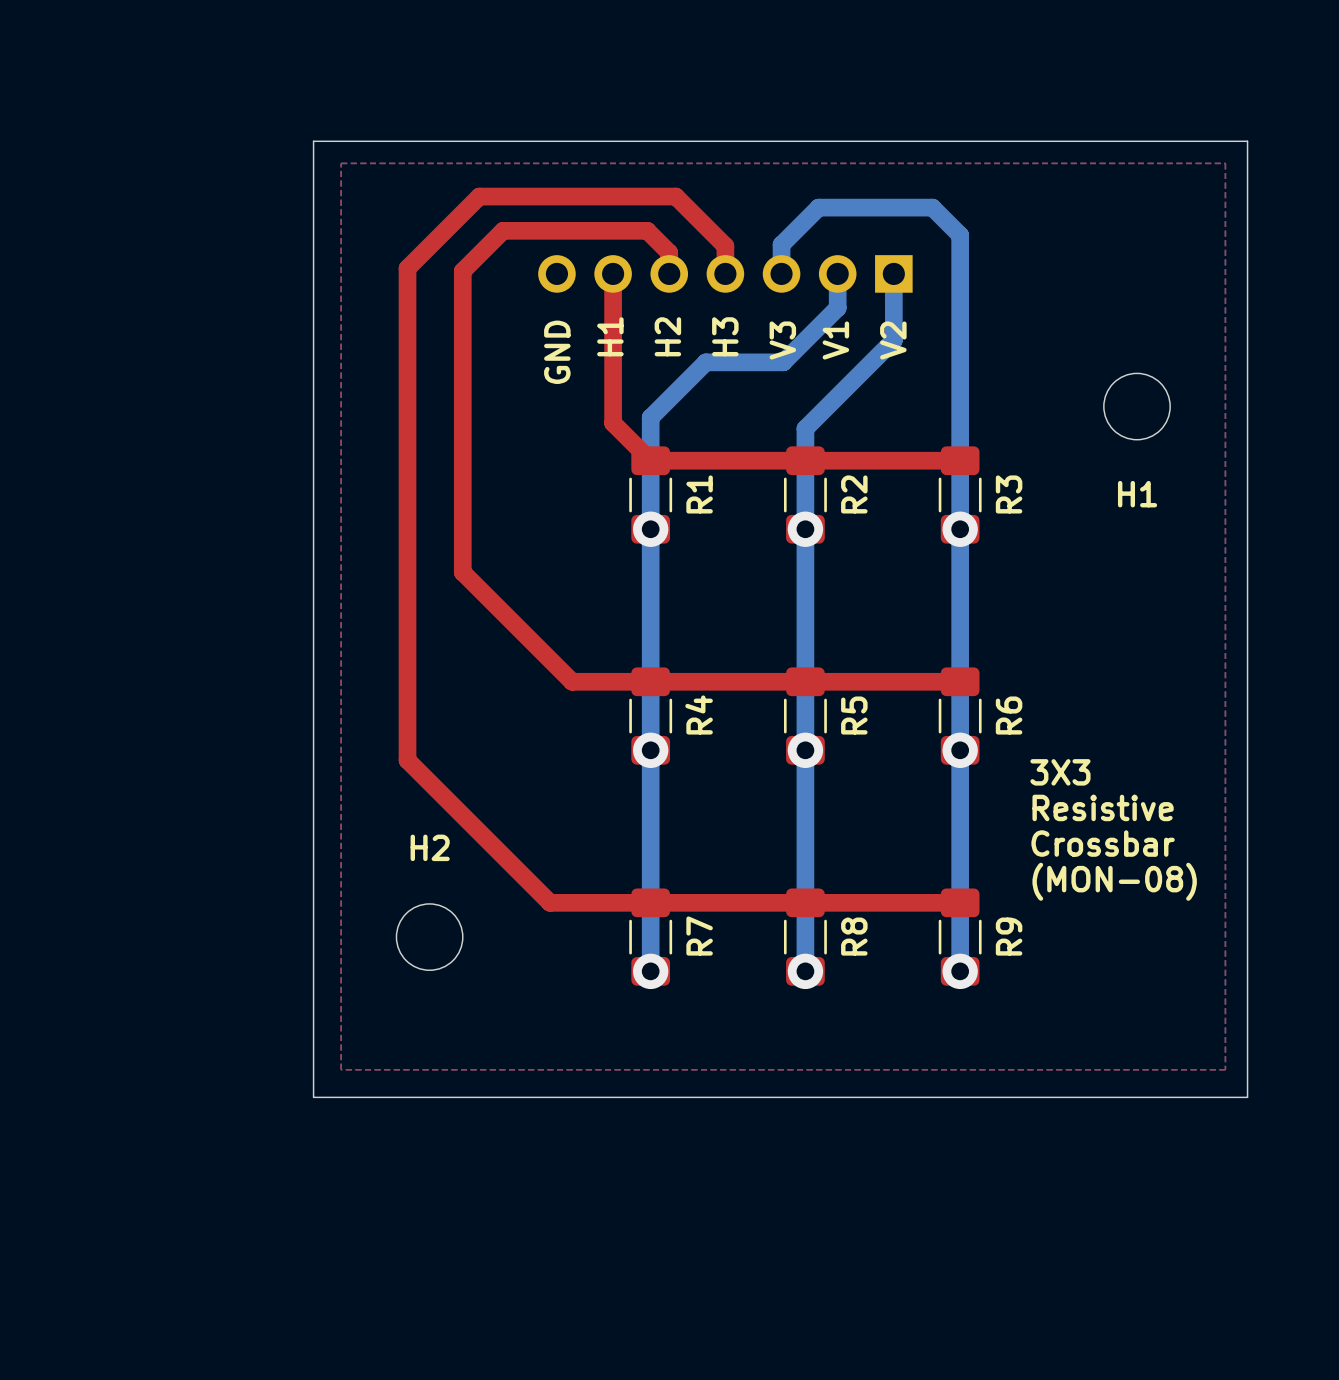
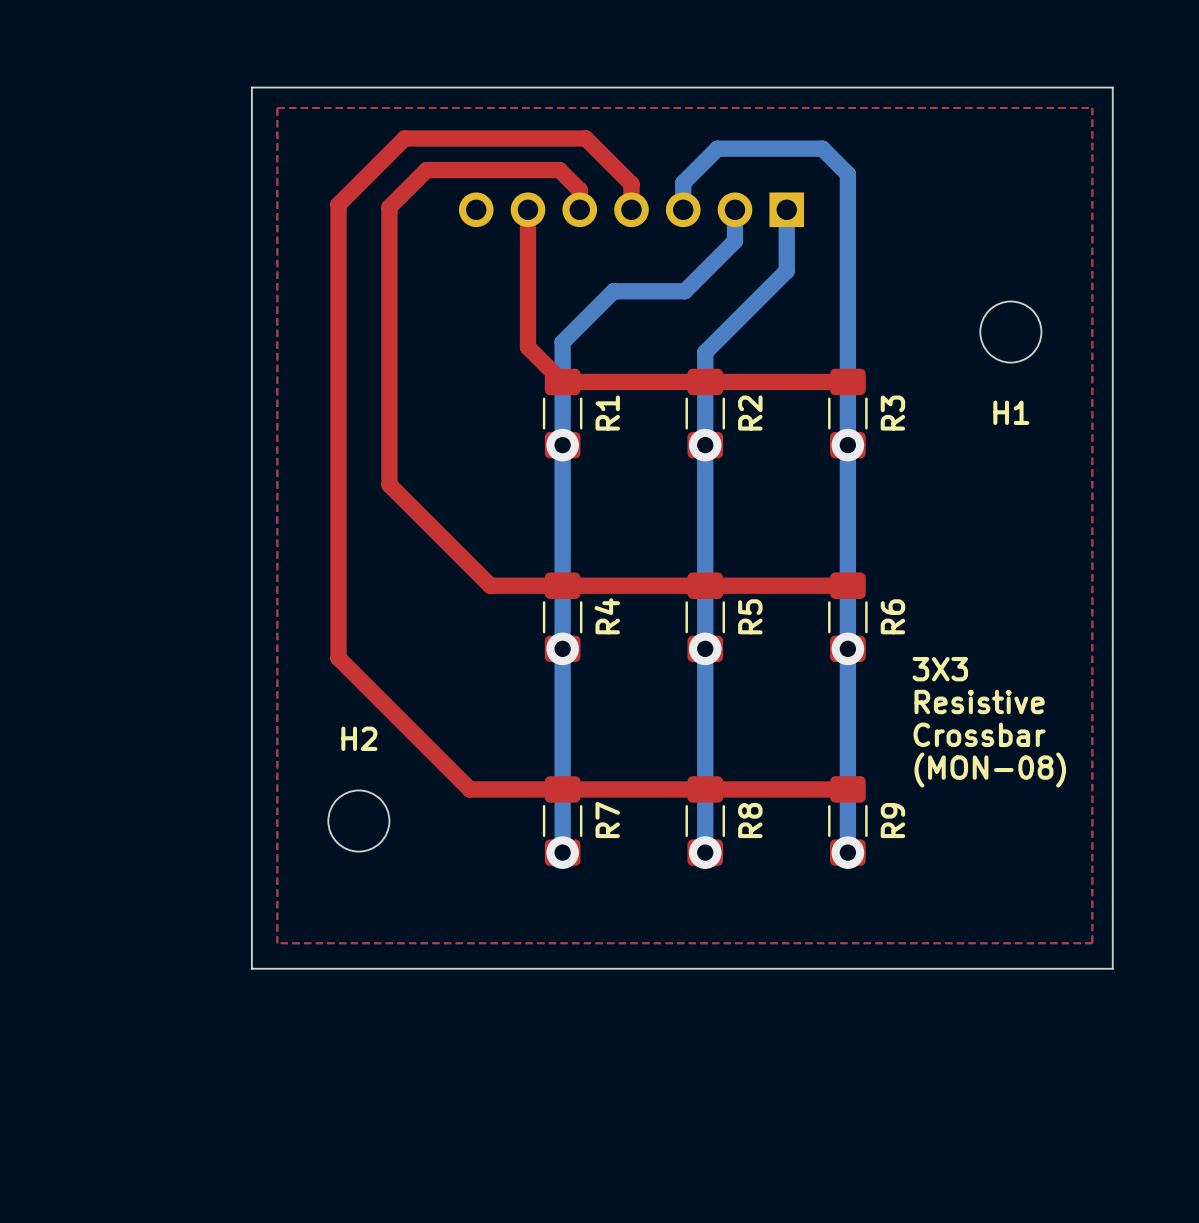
text: H1 (610, 336) -> none
text: H2 (667, 336) -> none
text: H3 (725, 336) -> none
text: V3 (782, 340) -> none
text: V1 (835, 340) -> none
text: V2 (893, 340) -> none
text: GND (557, 352) -> none

